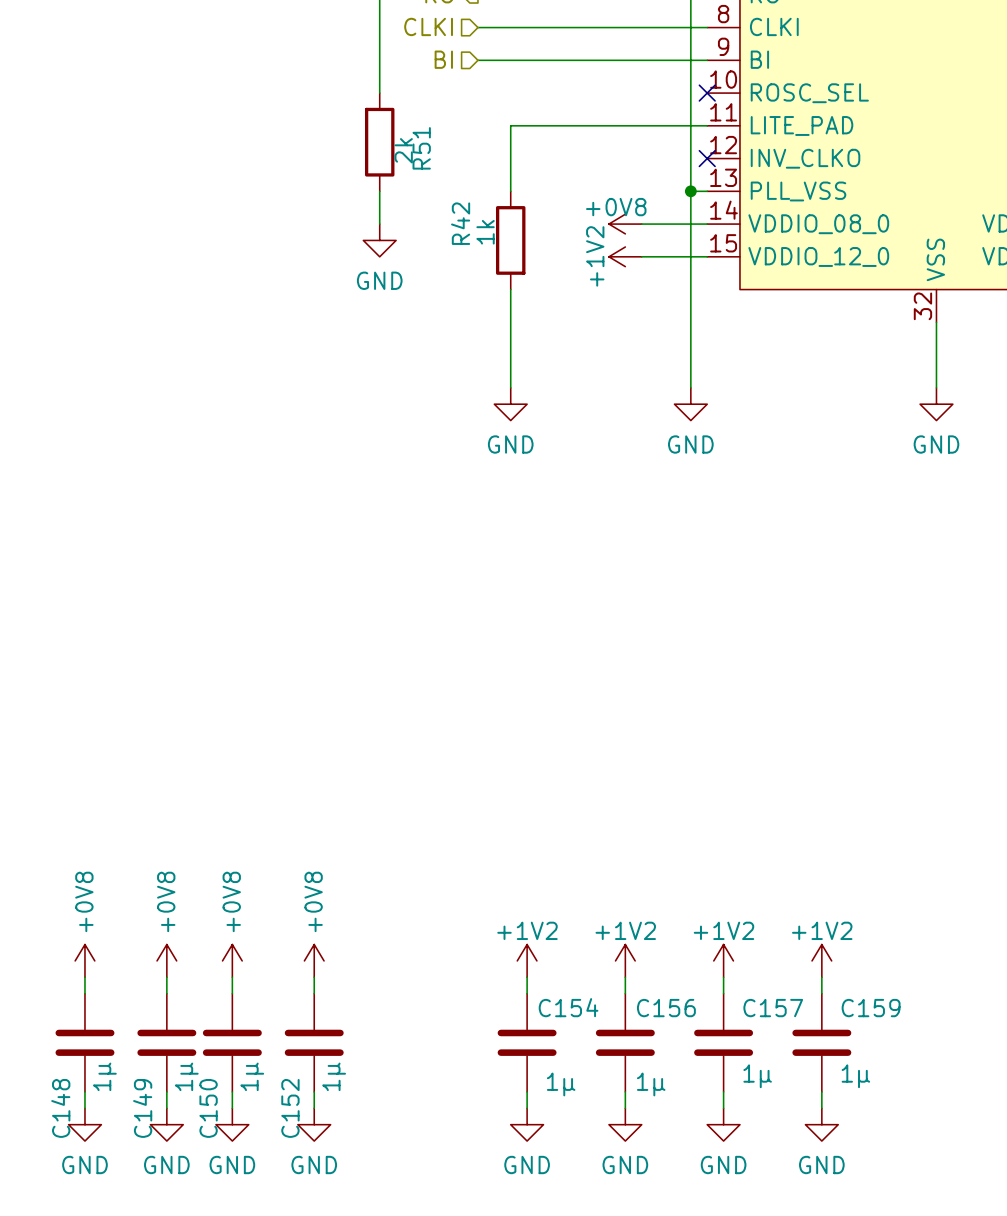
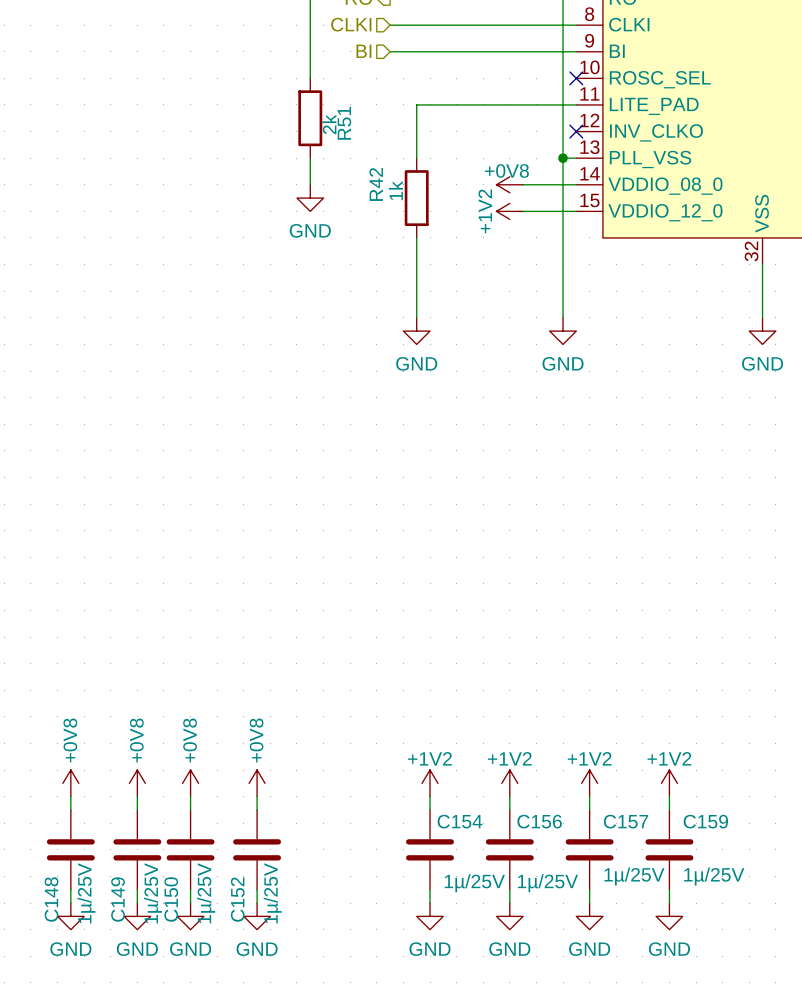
C148 value: 1µ (104, 1076) -> 1µ/25V (86, 893)
C149 value: 1µ (186, 1076) -> 1µ/25V (152, 893)
C150 value: 1µ (252, 1076) -> 1µ/25V (206, 893)
C152 value: 1µ (334, 1076) -> 1µ/25V (272, 893)
C157 value: 1µ (757, 1076) -> 1µ/25V (634, 876)
C159 value: 1µ (855, 1076) -> 1µ/25V (714, 876)
C154 value: 1µ (561, 1084) -> 1µ/25V (474, 883)
C156 value: 1µ (651, 1084) -> 1µ/25V (547, 883)

